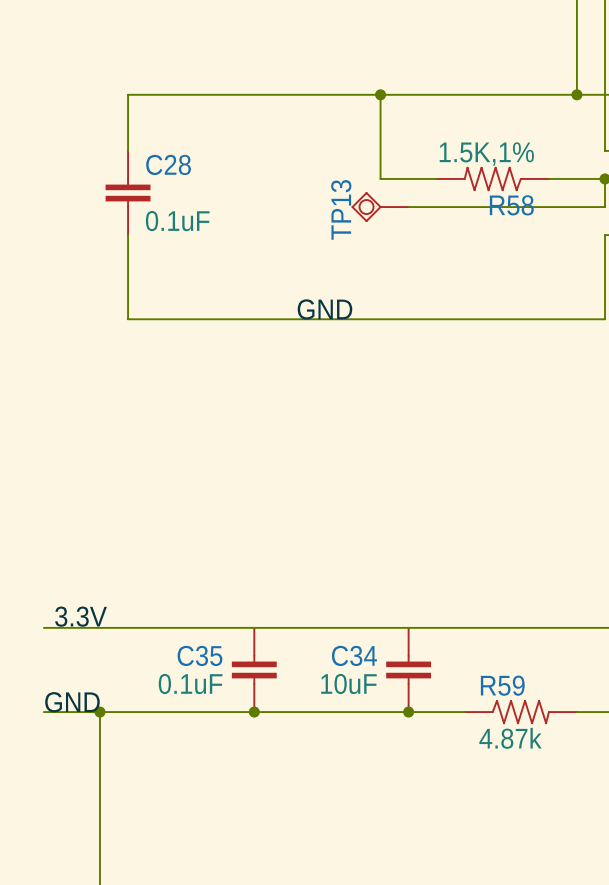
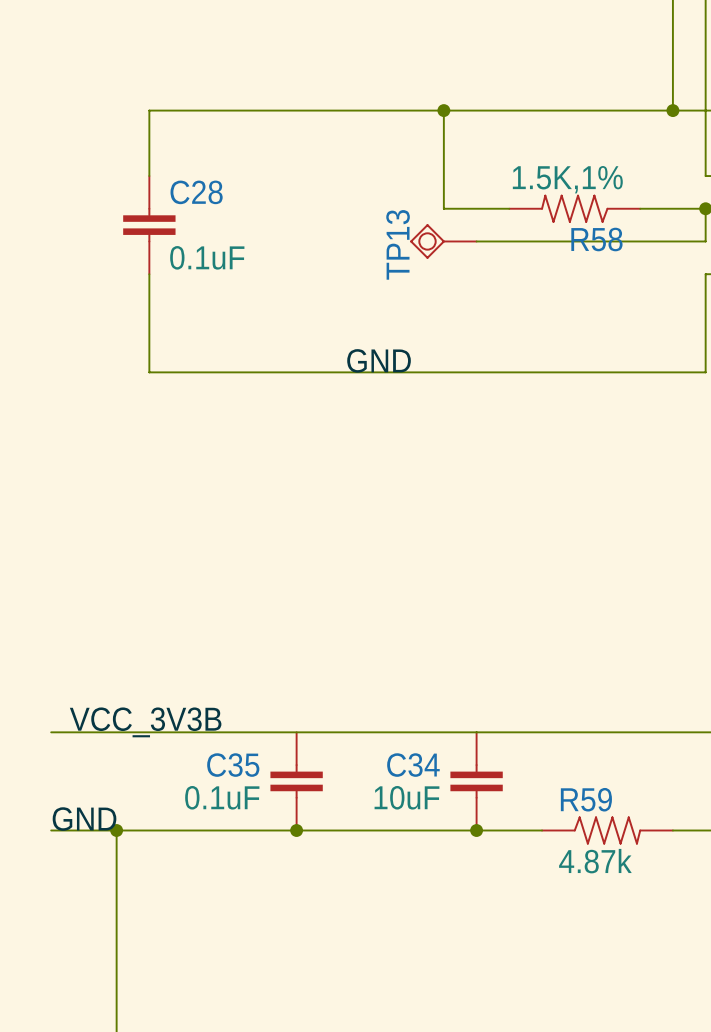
label: 3.3V (81, 616) -> none
label: none -> VCC_3V3B (145, 722)

